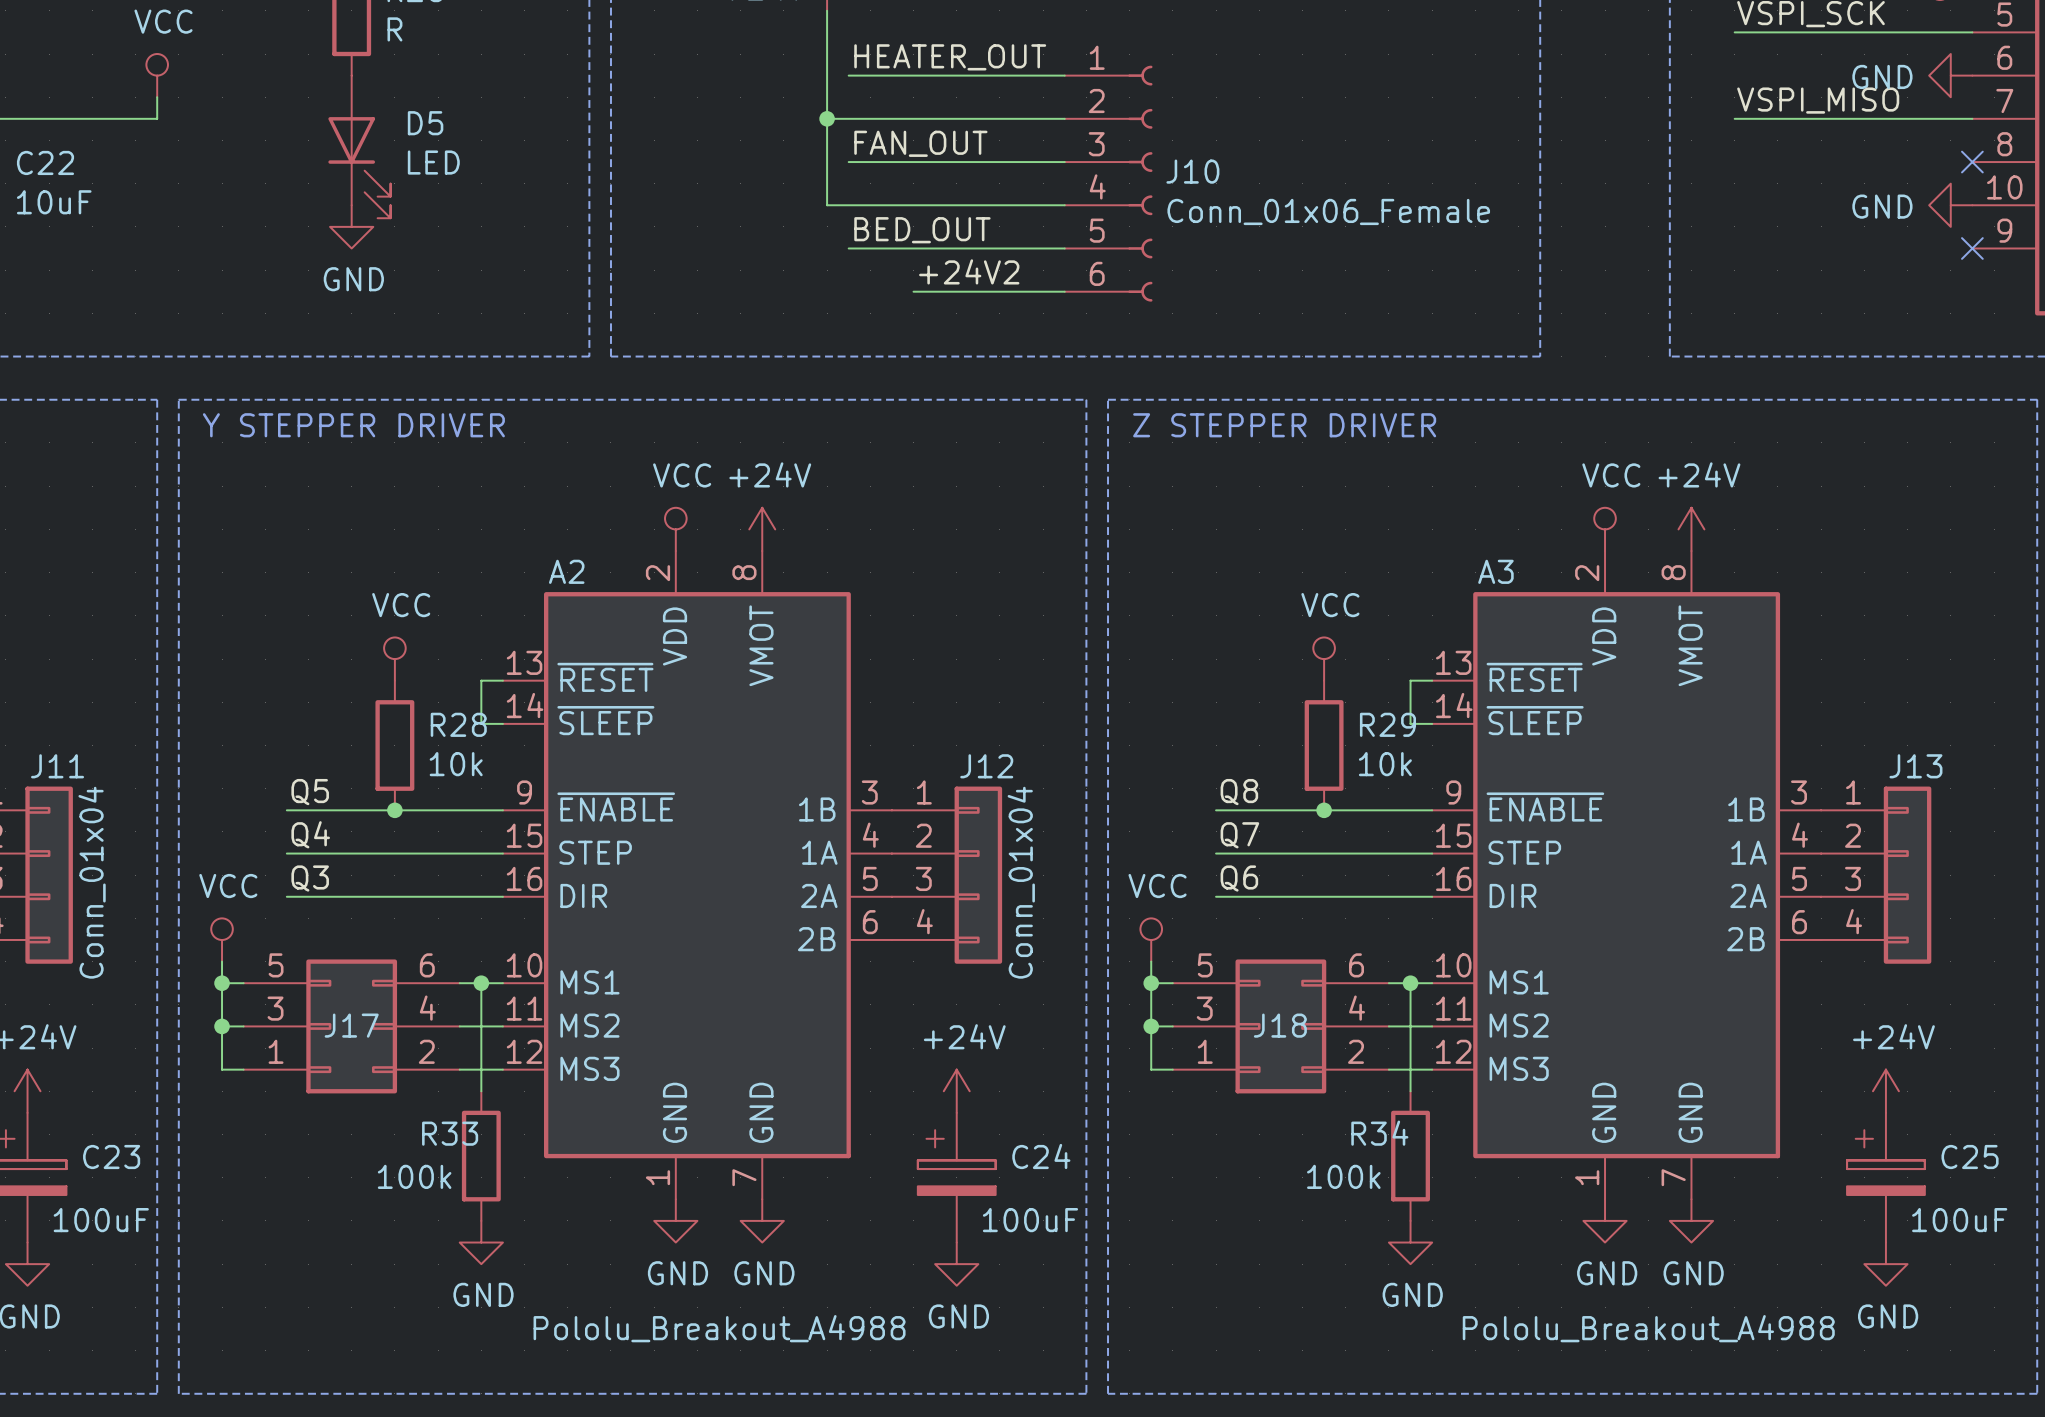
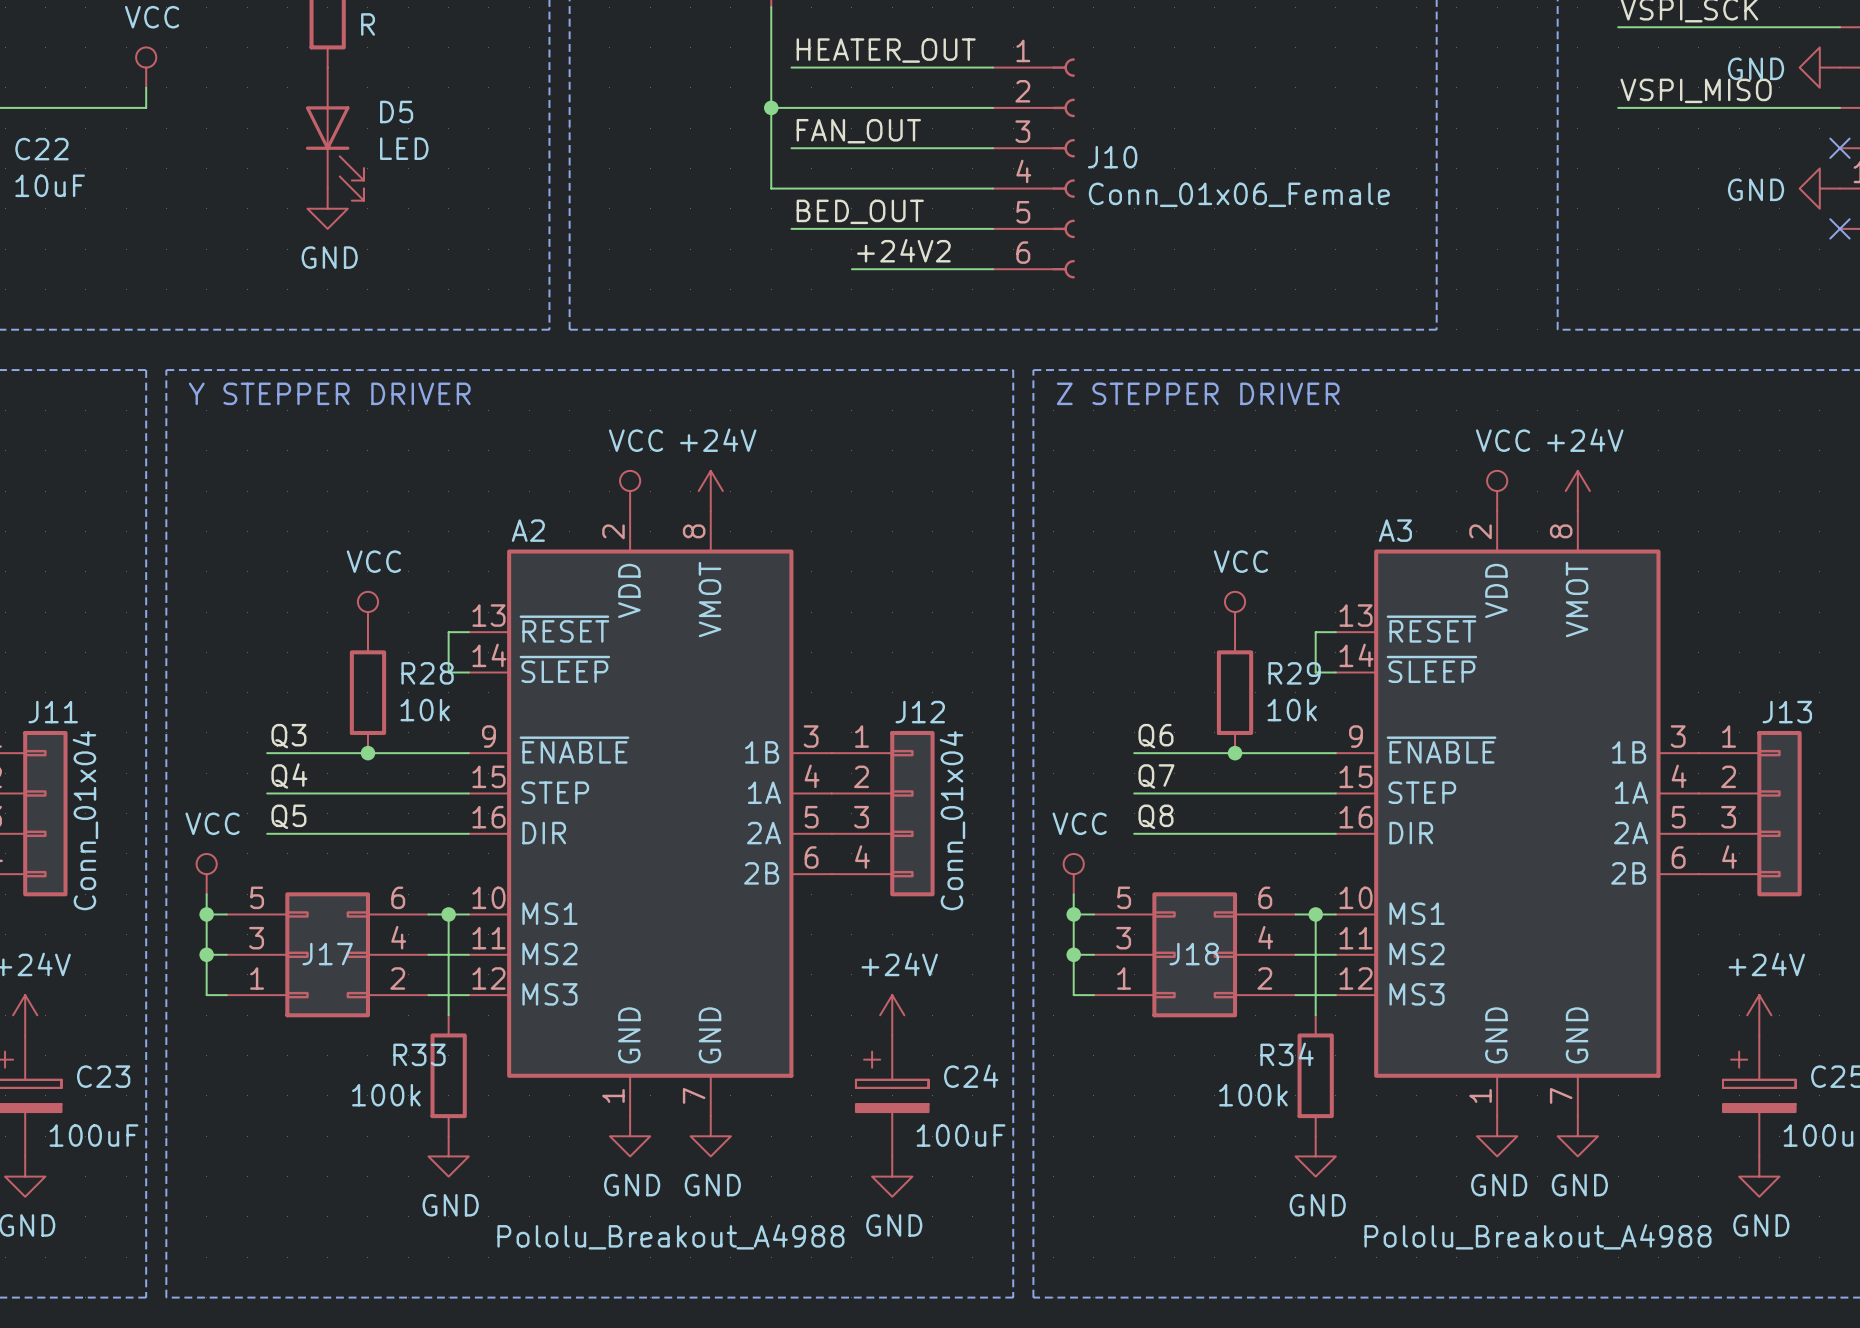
label: Q5 (310, 792) -> Q3 (288, 736)
label: Q8 (1239, 792) -> Q6 (1155, 736)
label: Q3 (310, 878) -> Q5 (288, 816)
label: Q6 (1239, 878) -> Q8 (1155, 816)

